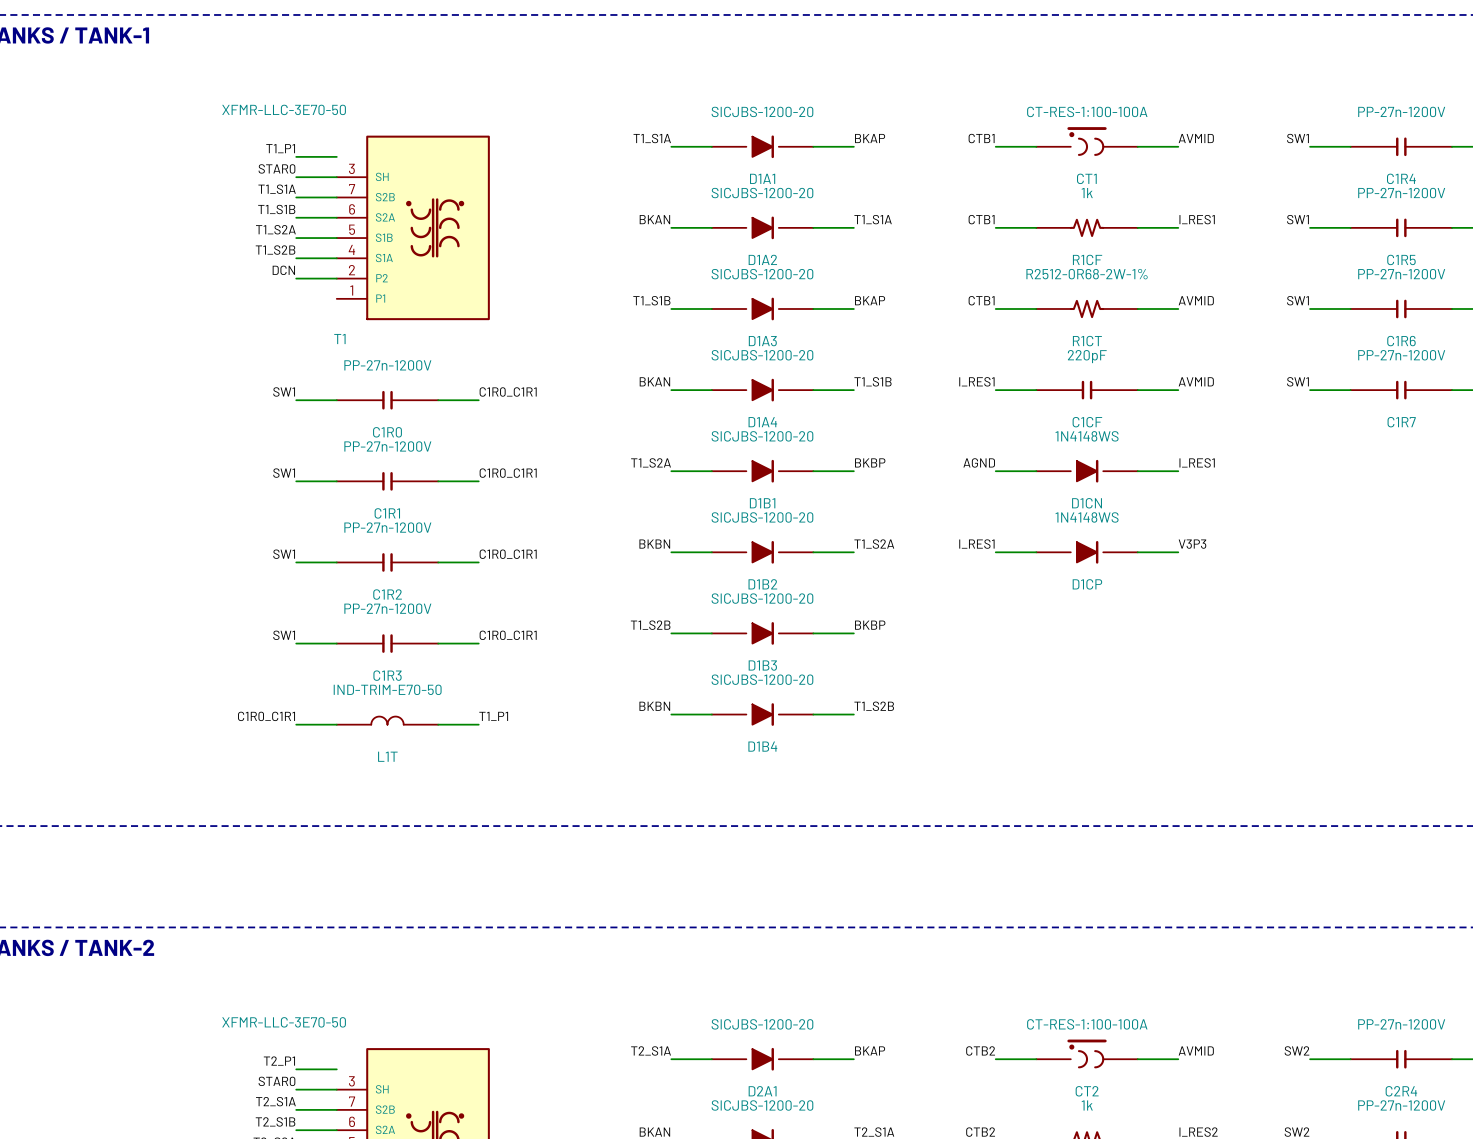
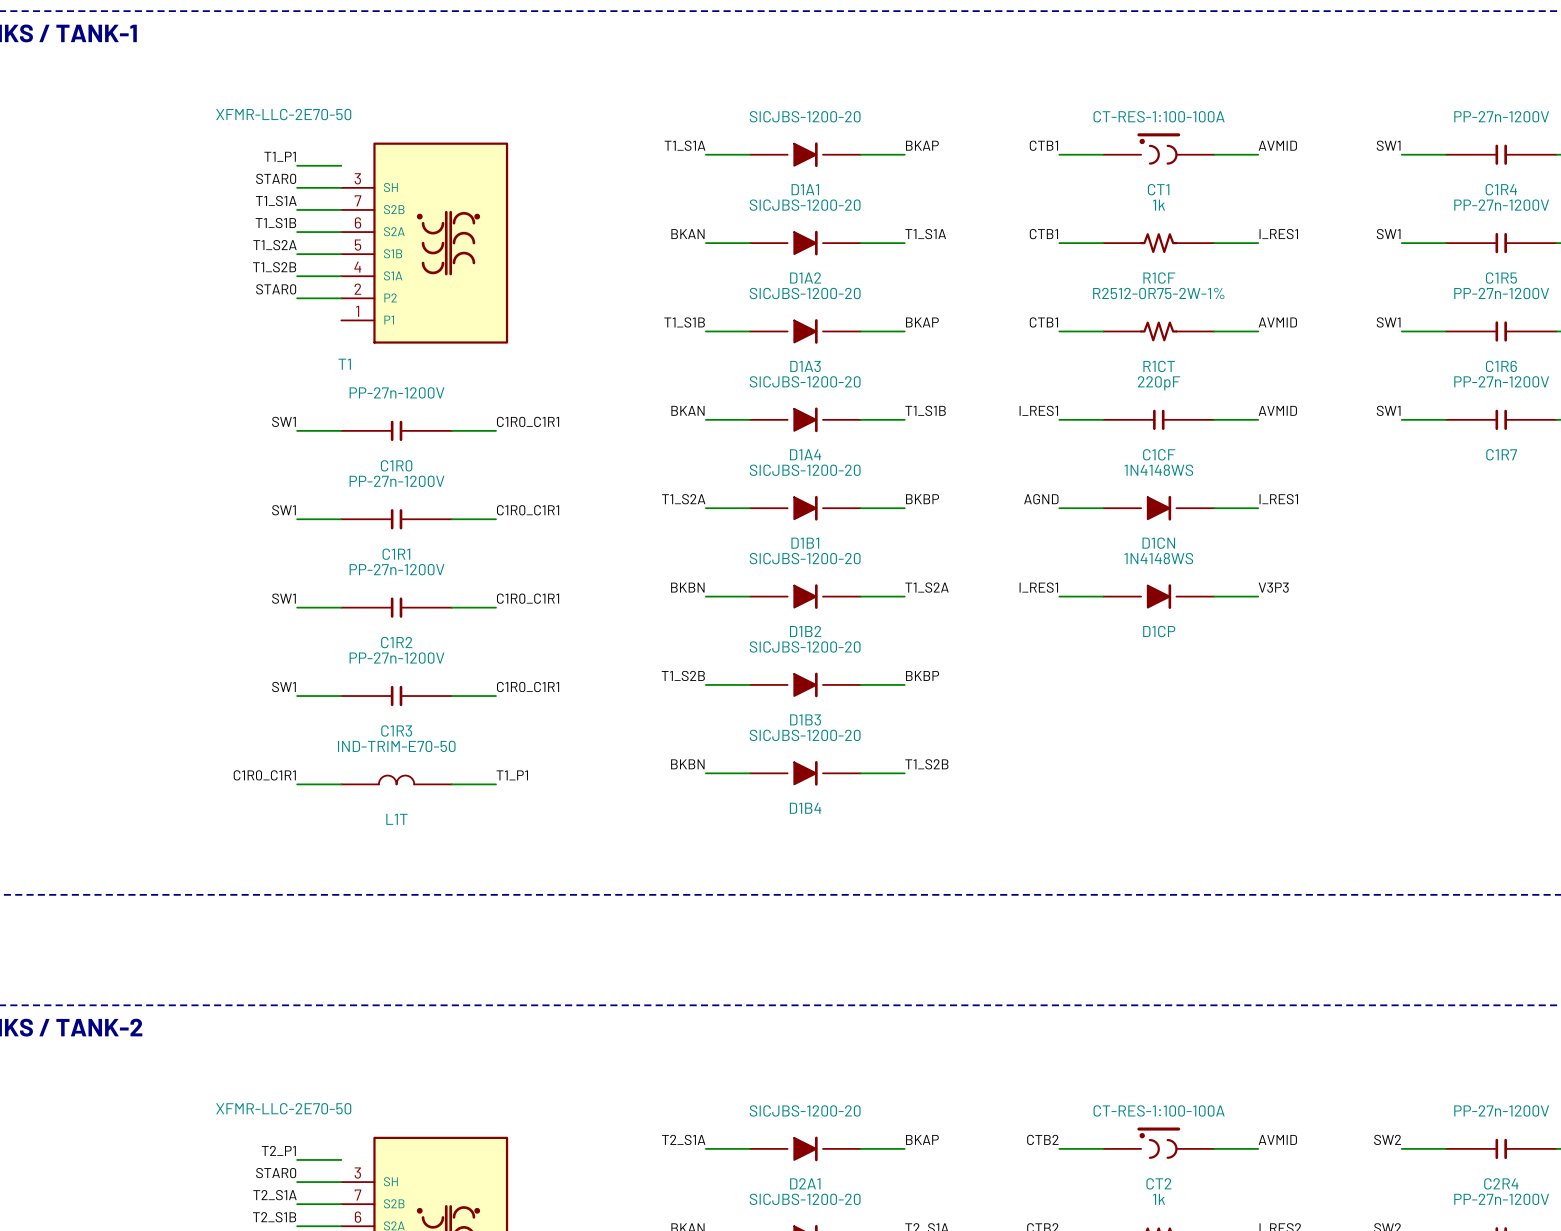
T1 value: XFMR-LLC-3E70-50 (284, 109) -> XFMR-LLC-2E70-50 (283, 114)
label: DCN (283, 270) -> STAR0 (276, 289)
R1CT value: R2512-0R68-2W-1% (1087, 274) -> R2512-0R75-2W-1% (1158, 293)
part value: XFMR-LLC-3E70-50 (284, 1022) -> XFMR-LLC-2E70-50 (283, 1108)

